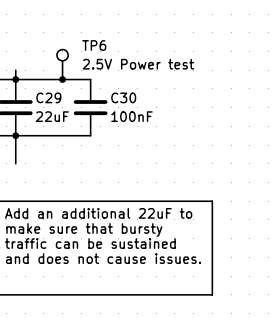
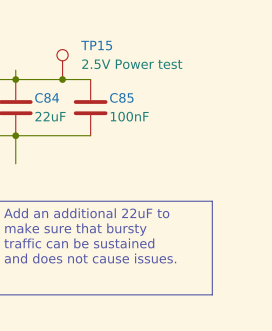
TP6 name: TP6 (94, 45) -> TP15 (96, 45)
C29 name: C29 (48, 97) -> C84 (47, 97)
C30 name: C30 (123, 97) -> C85 (121, 97)

